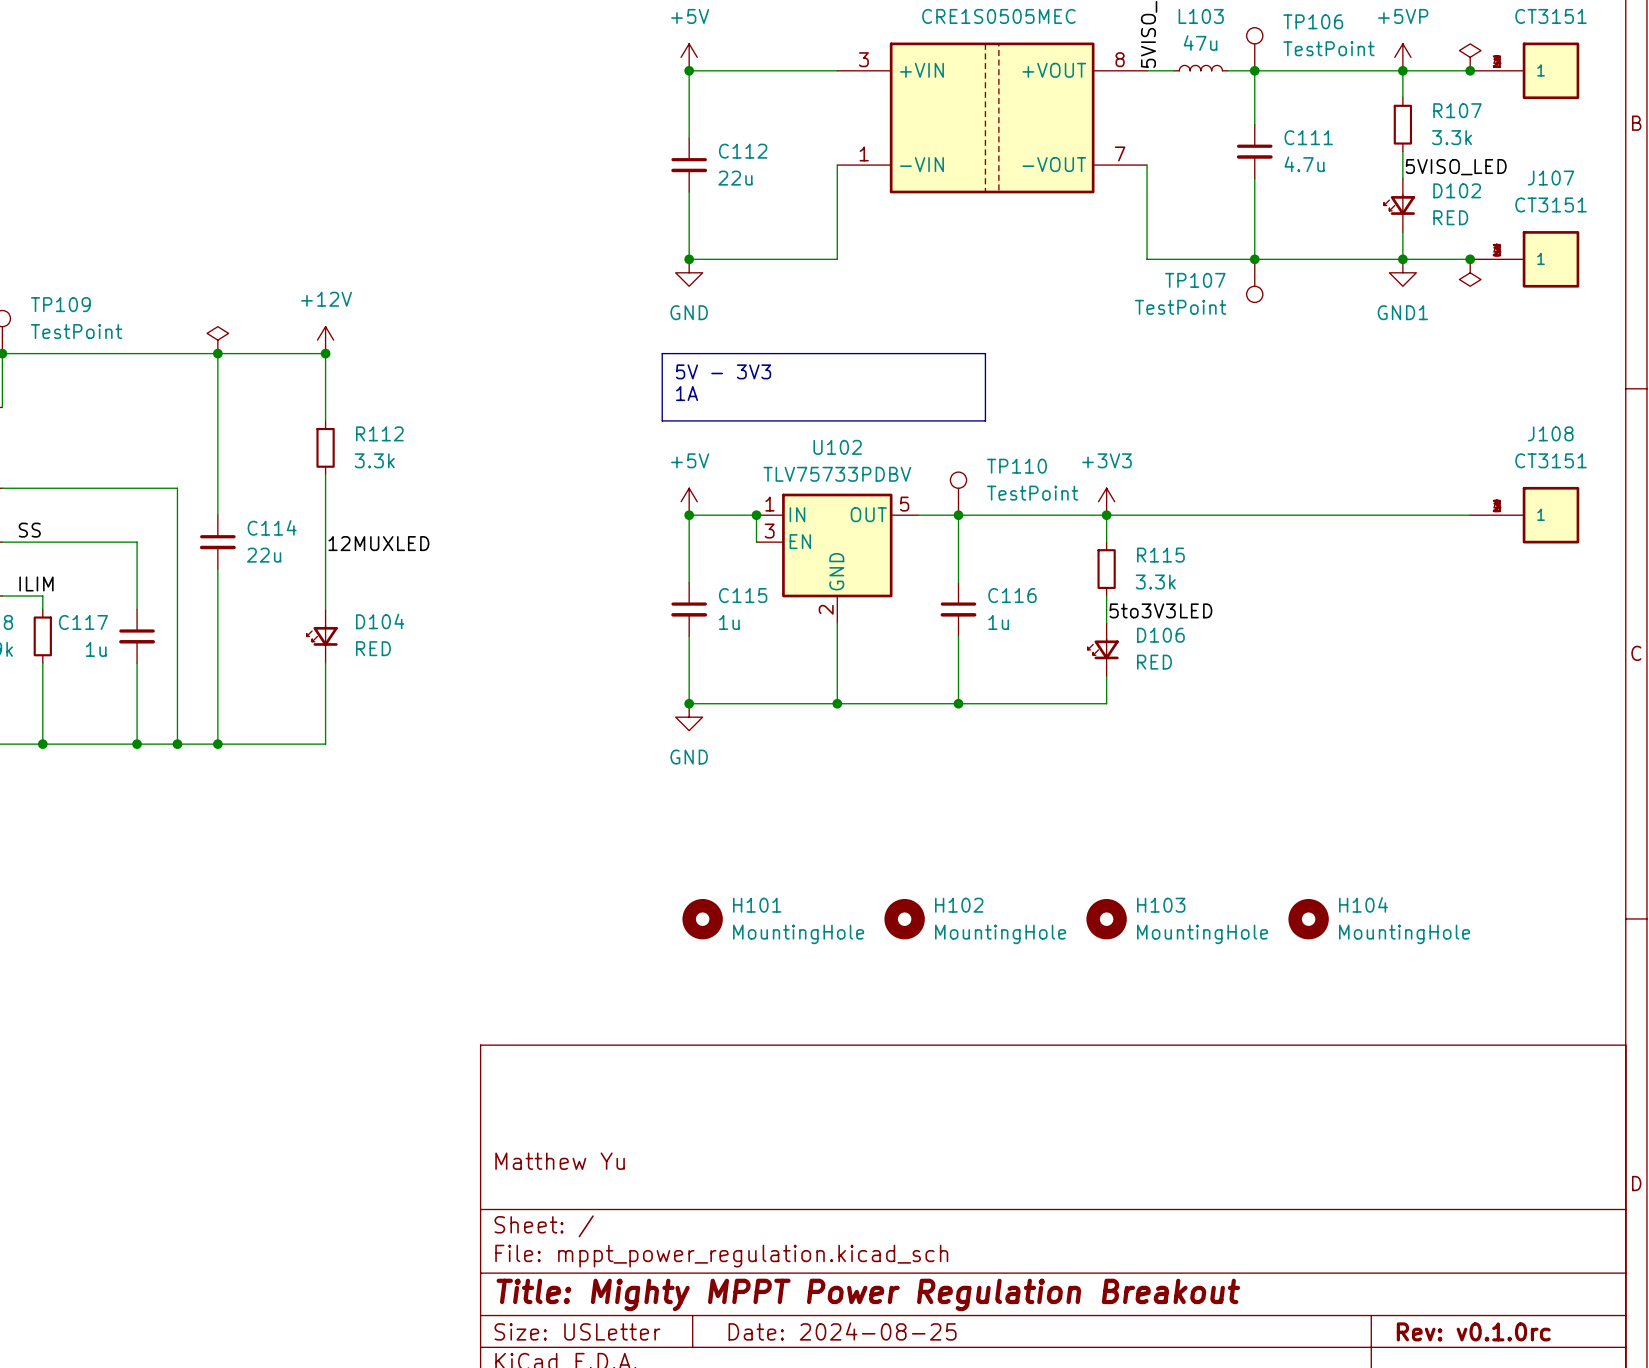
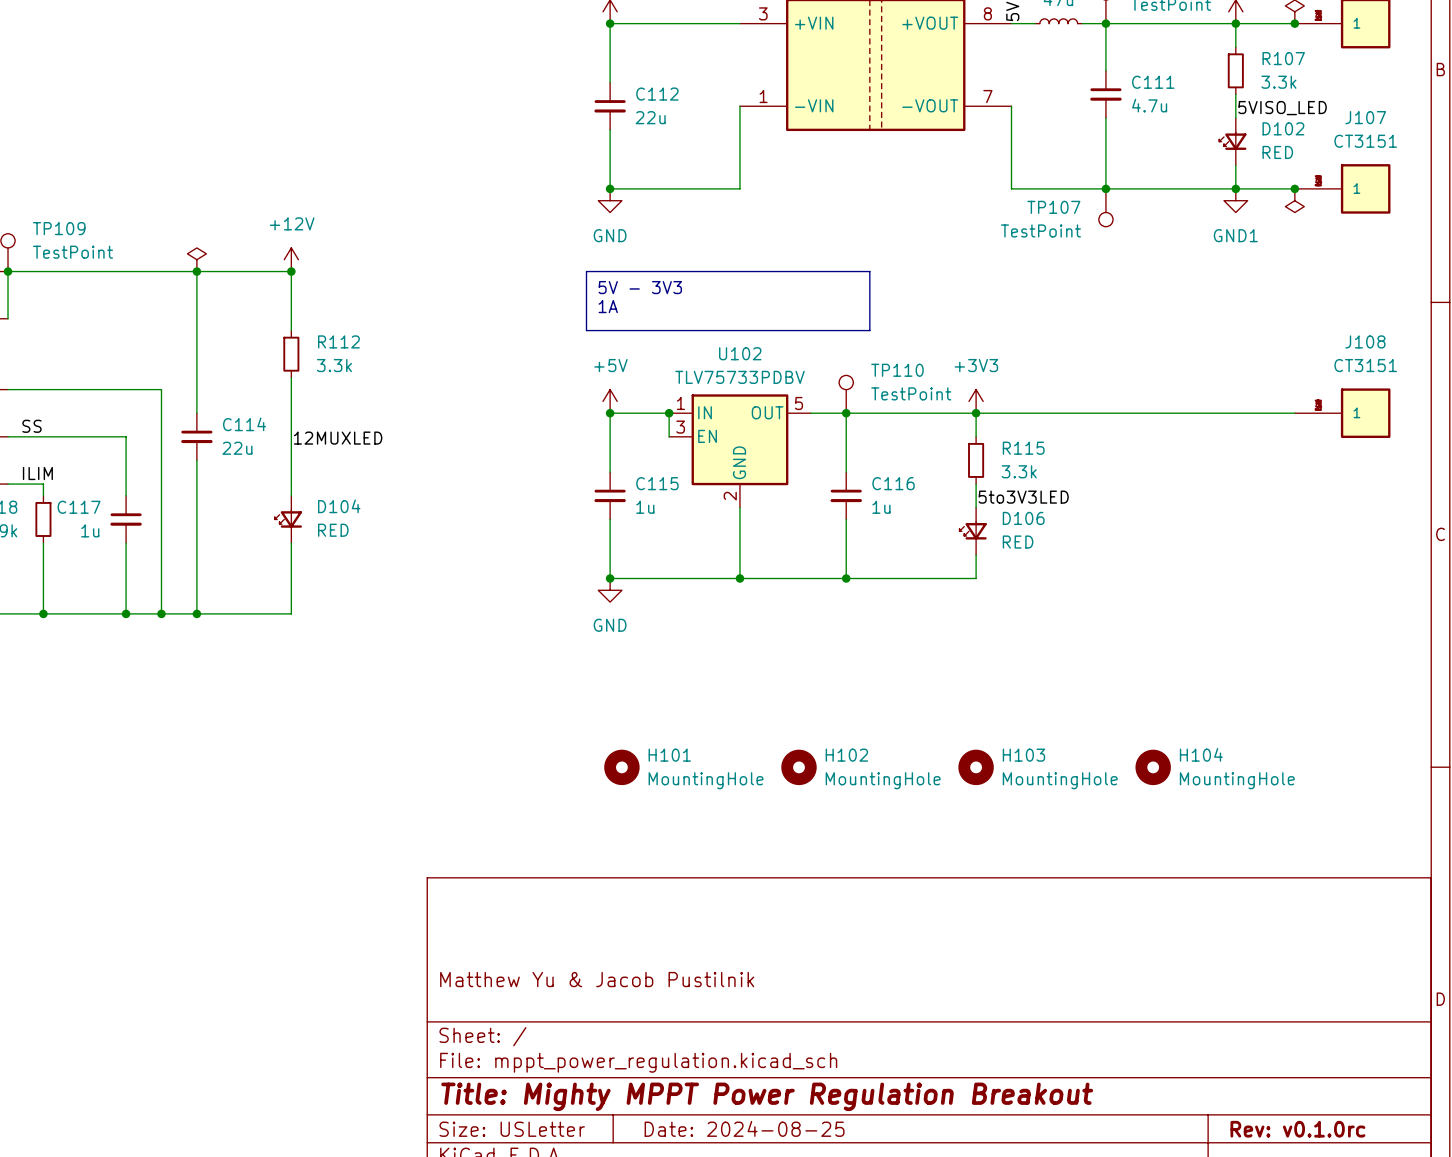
title block: Matthew Yu (560, 1161) -> Matthew Yu & Jacob Pustilnik (597, 979)

